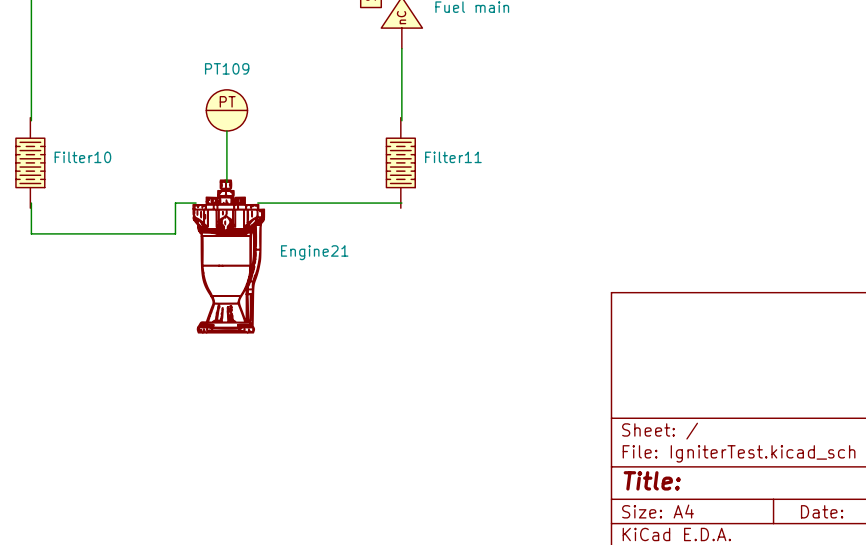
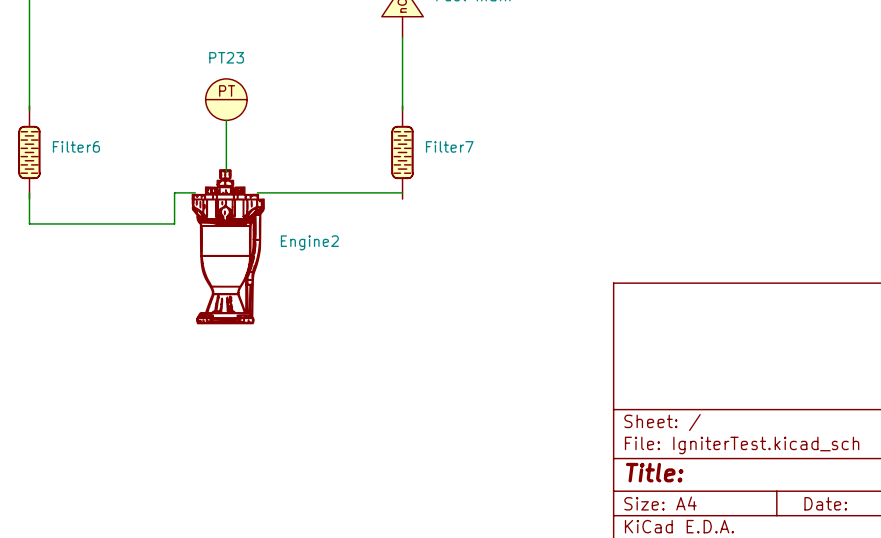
PT109 name: PT109 (227, 68) -> PT23 (226, 57)
Filter10: (30, 162) -> none
Filter6: none -> (29, 152)
Filter11: (400, 162) -> none
Filter7: none -> (402, 152)
Engine21 name: Engine21 (314, 252) -> Engine2 (309, 242)

